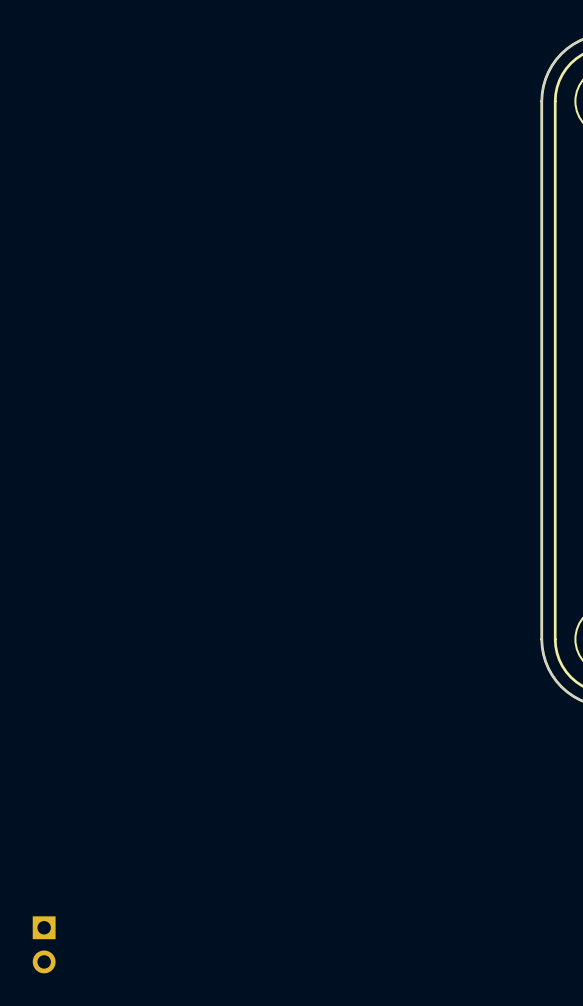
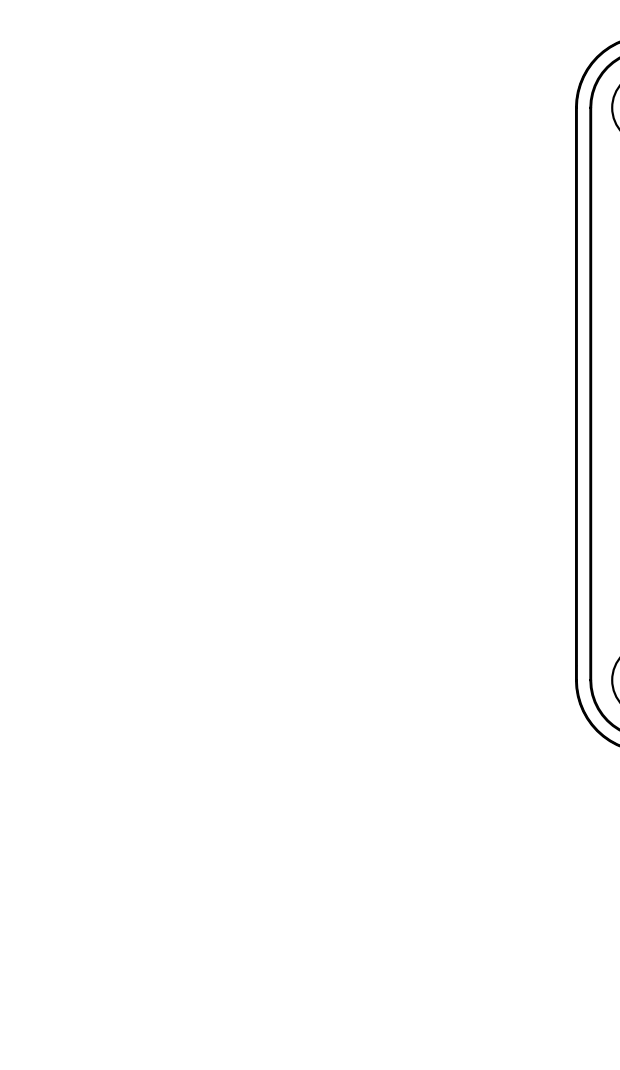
part: (44, 944) -> none

